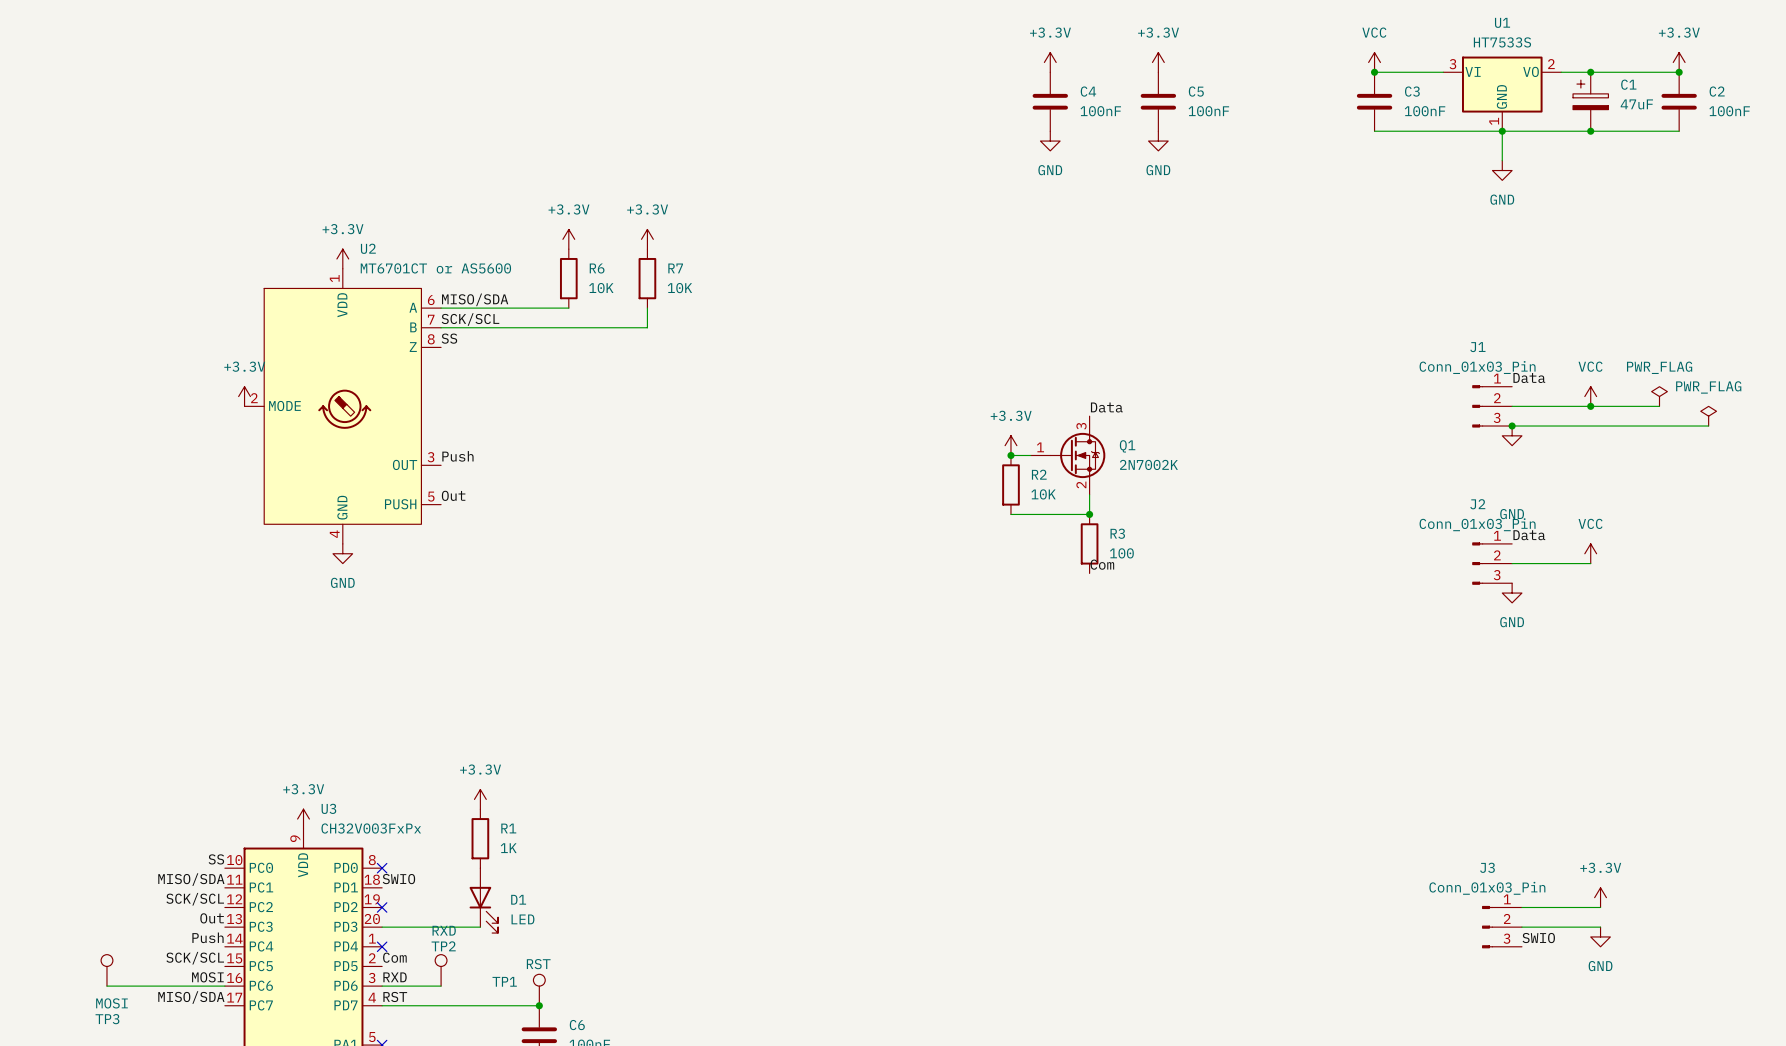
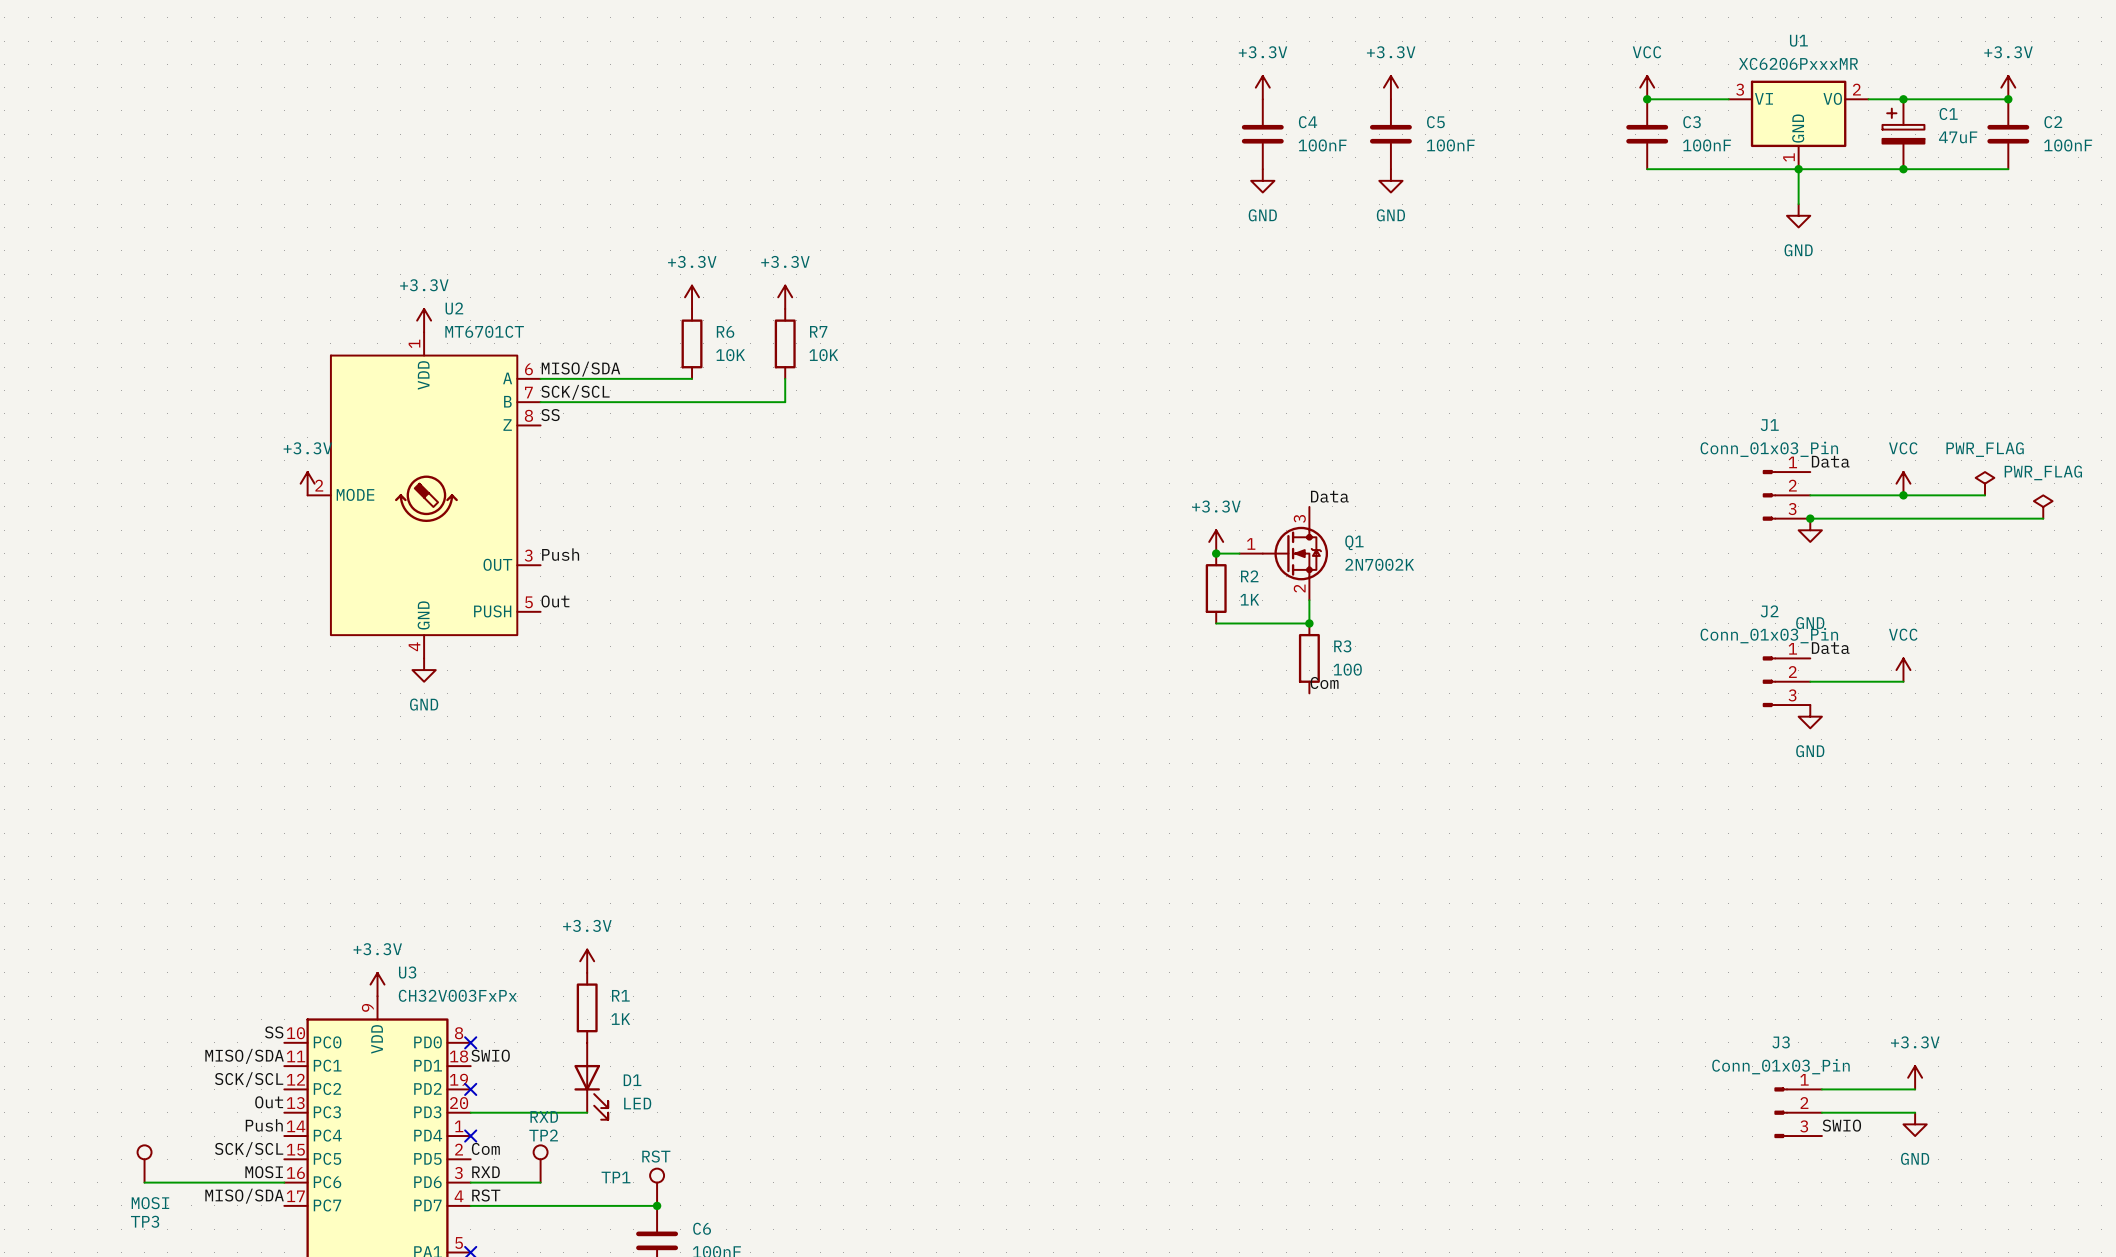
U1 value: HT7533S (1502, 42) -> XC6206PxxxMR (1798, 63)
U2 value: MT6701CT or AS5600 (435, 268) -> MT6701CT (484, 331)
R2 value: 10K (1043, 494) -> 1K (1249, 599)

